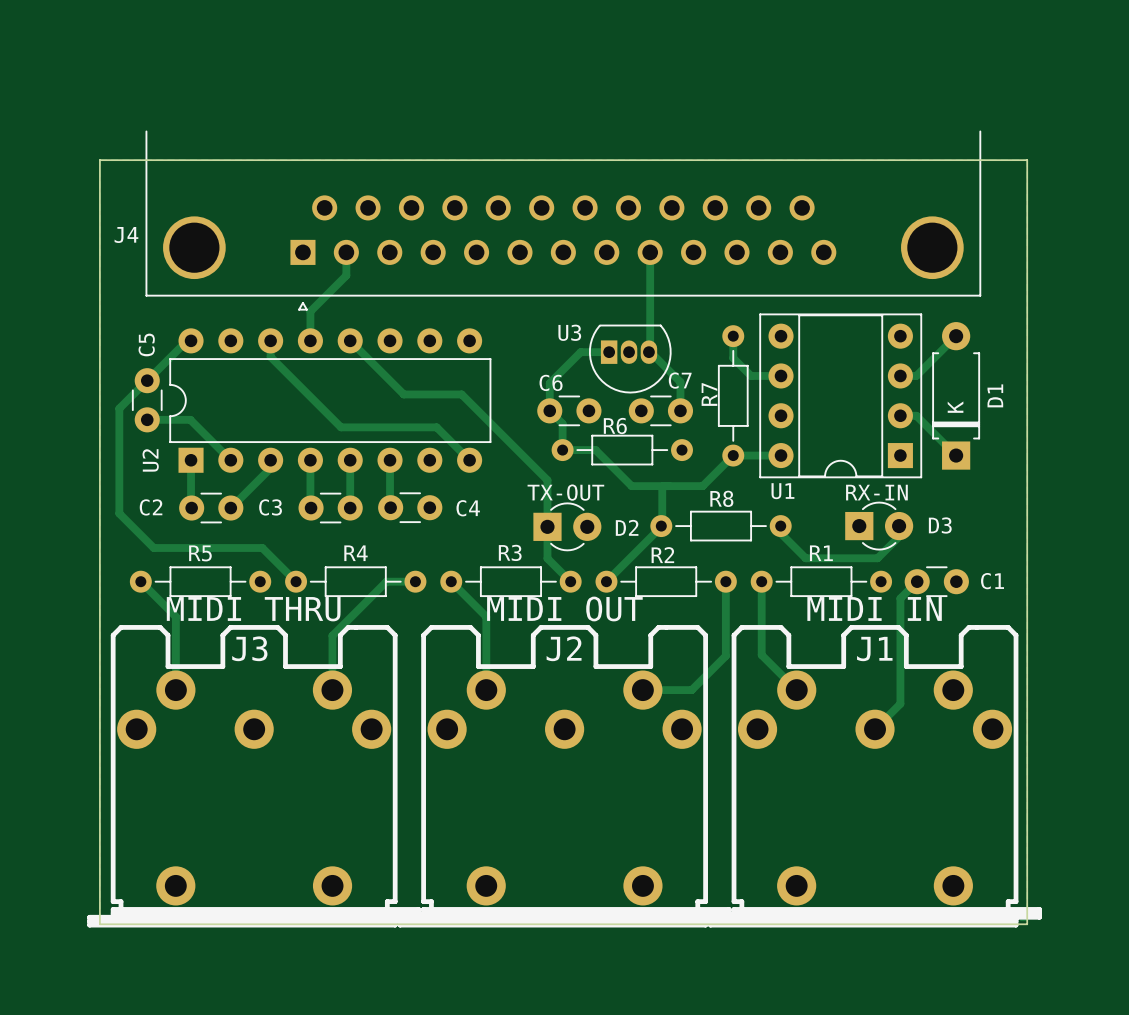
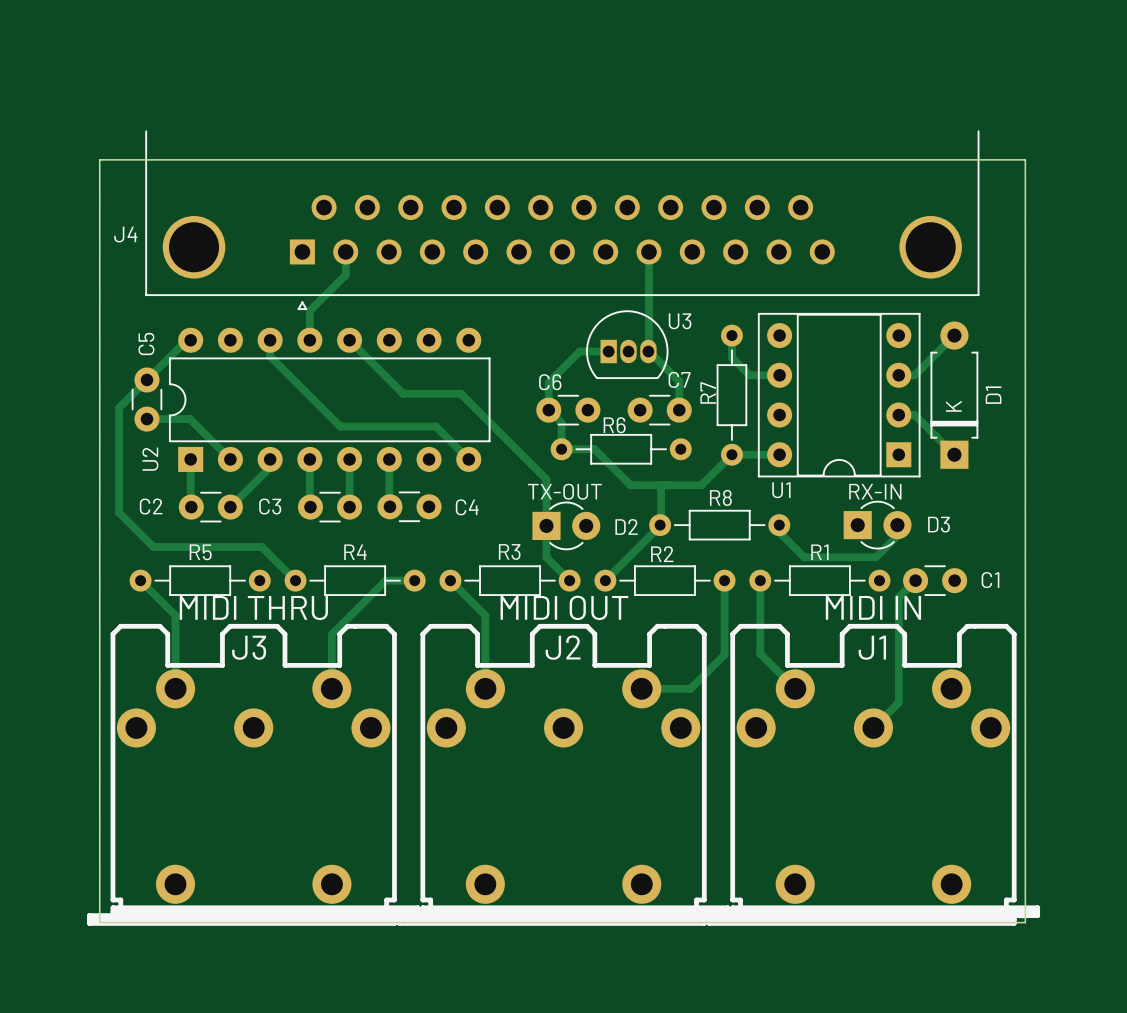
U3 footprint: [588, 324, 672, 394] -> [586, 310, 669, 380]
U3 name position: U3 (569, 332) -> U3 (680, 321)

